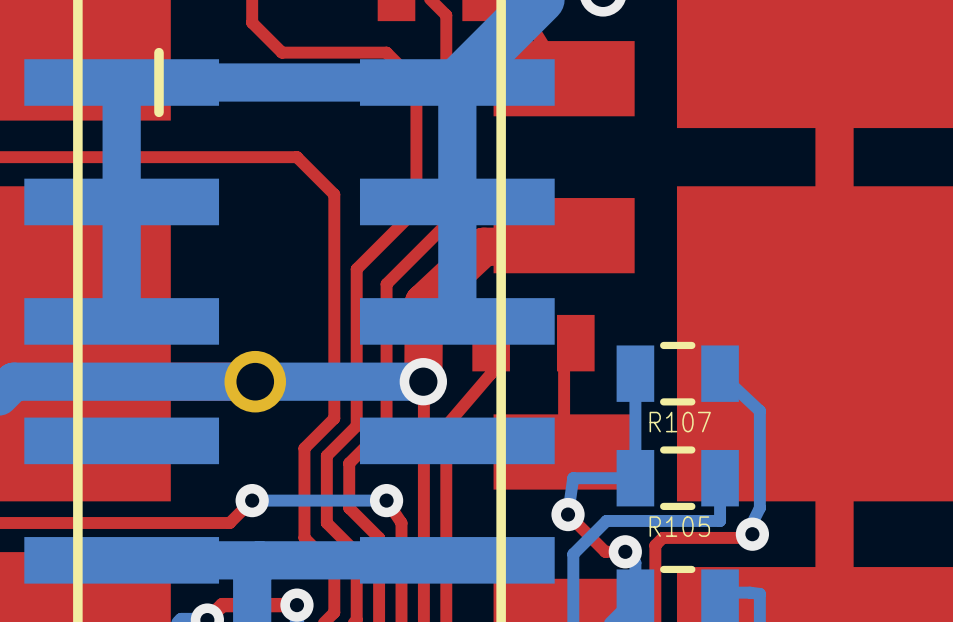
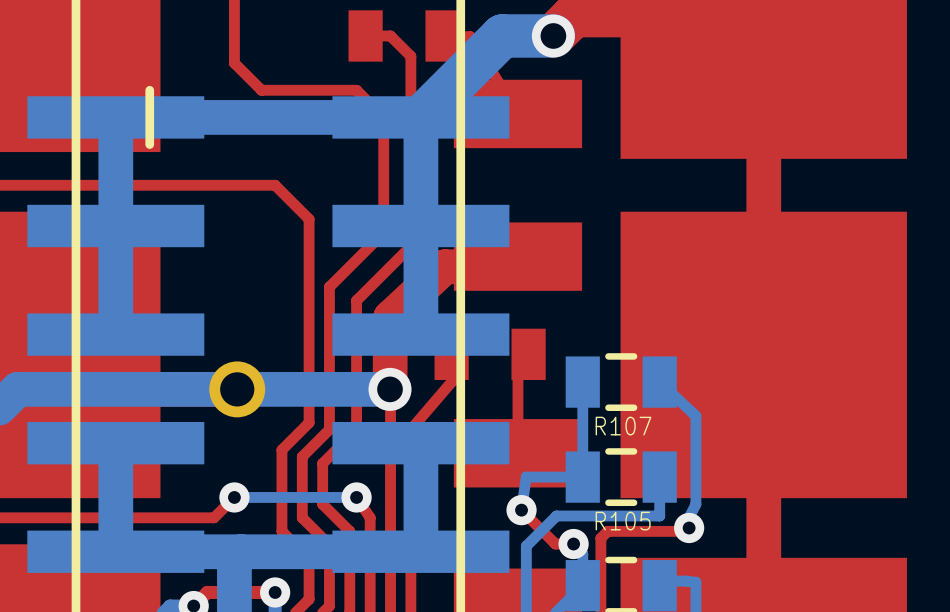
bottom track: none -> (115, 443) (115, 551)
bottom track: none -> (420, 443) (420, 551)

